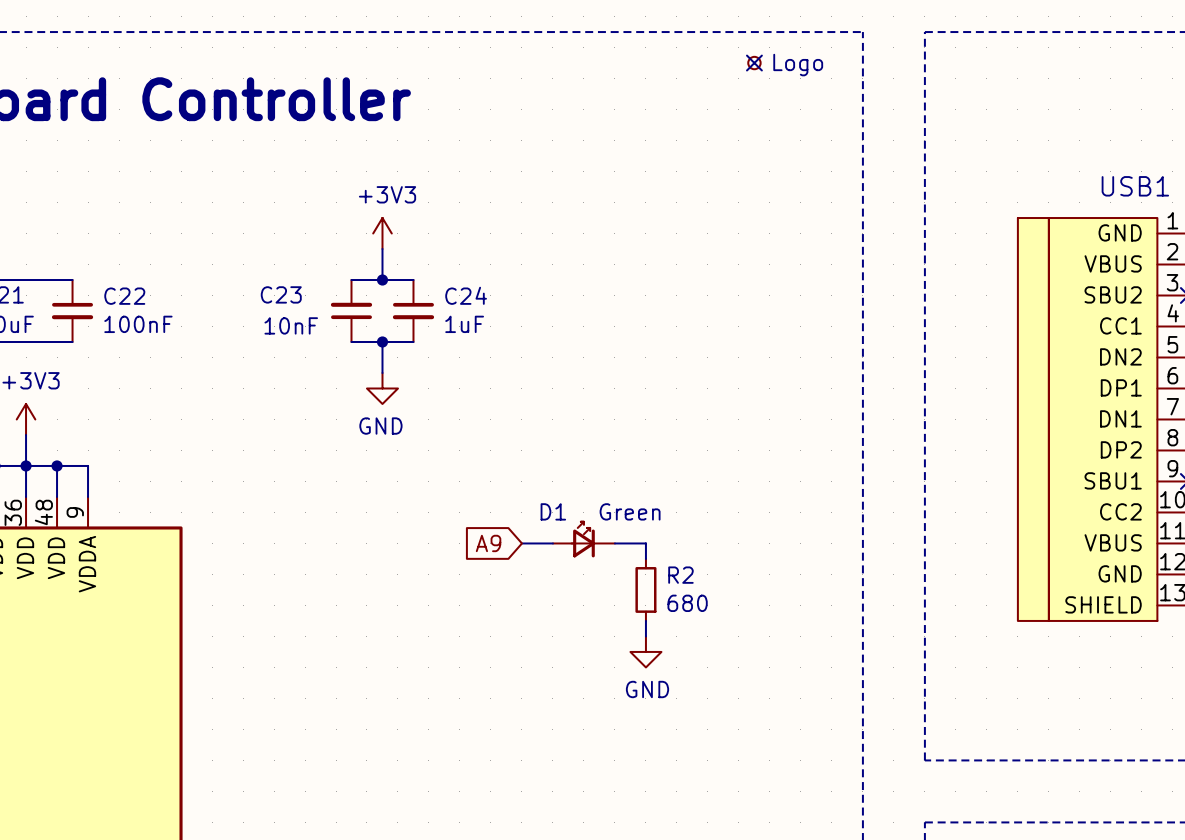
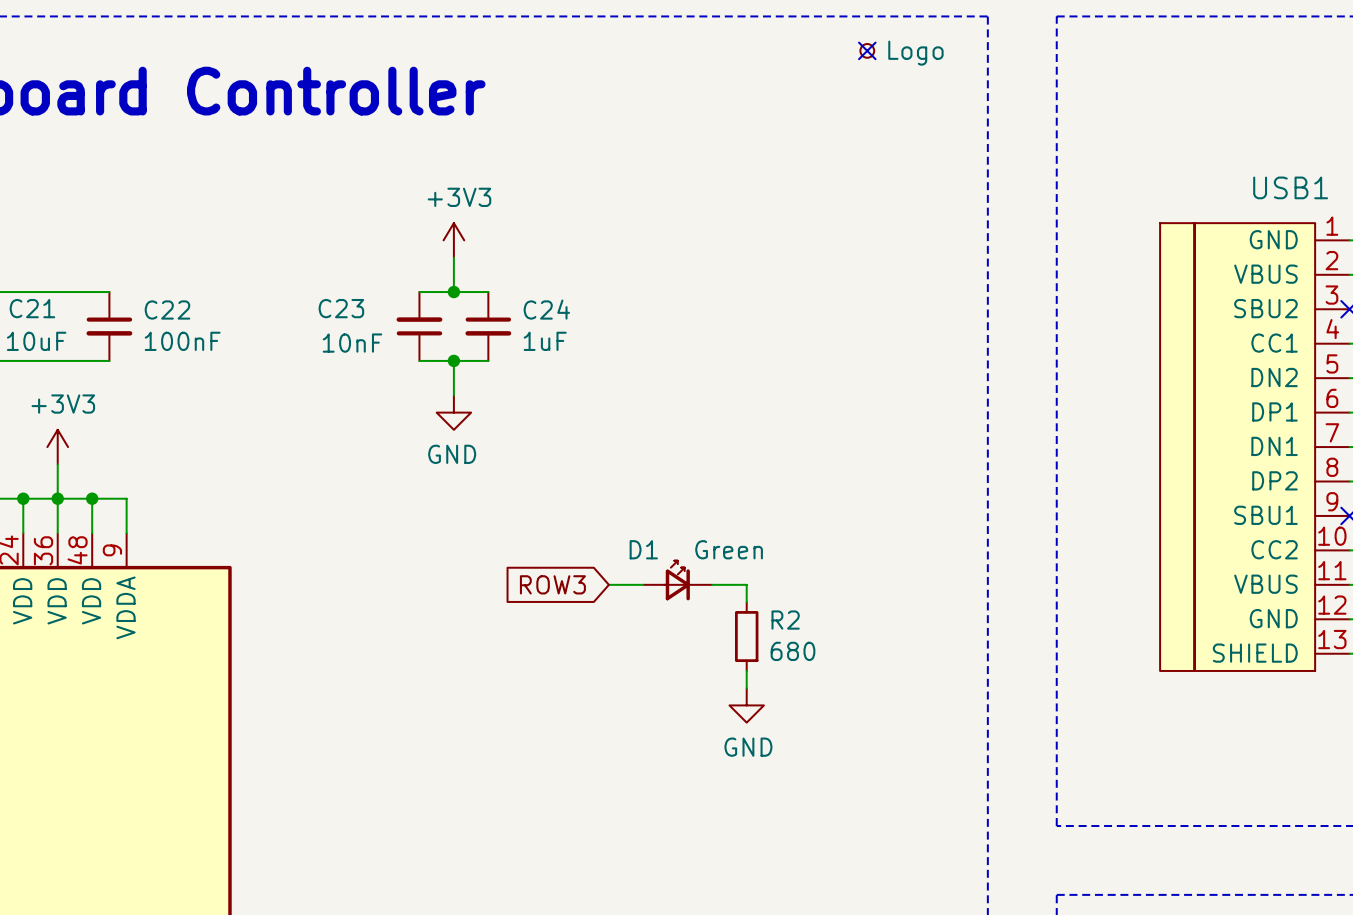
global label: A9 (488, 543) -> ROW3 (552, 584)

